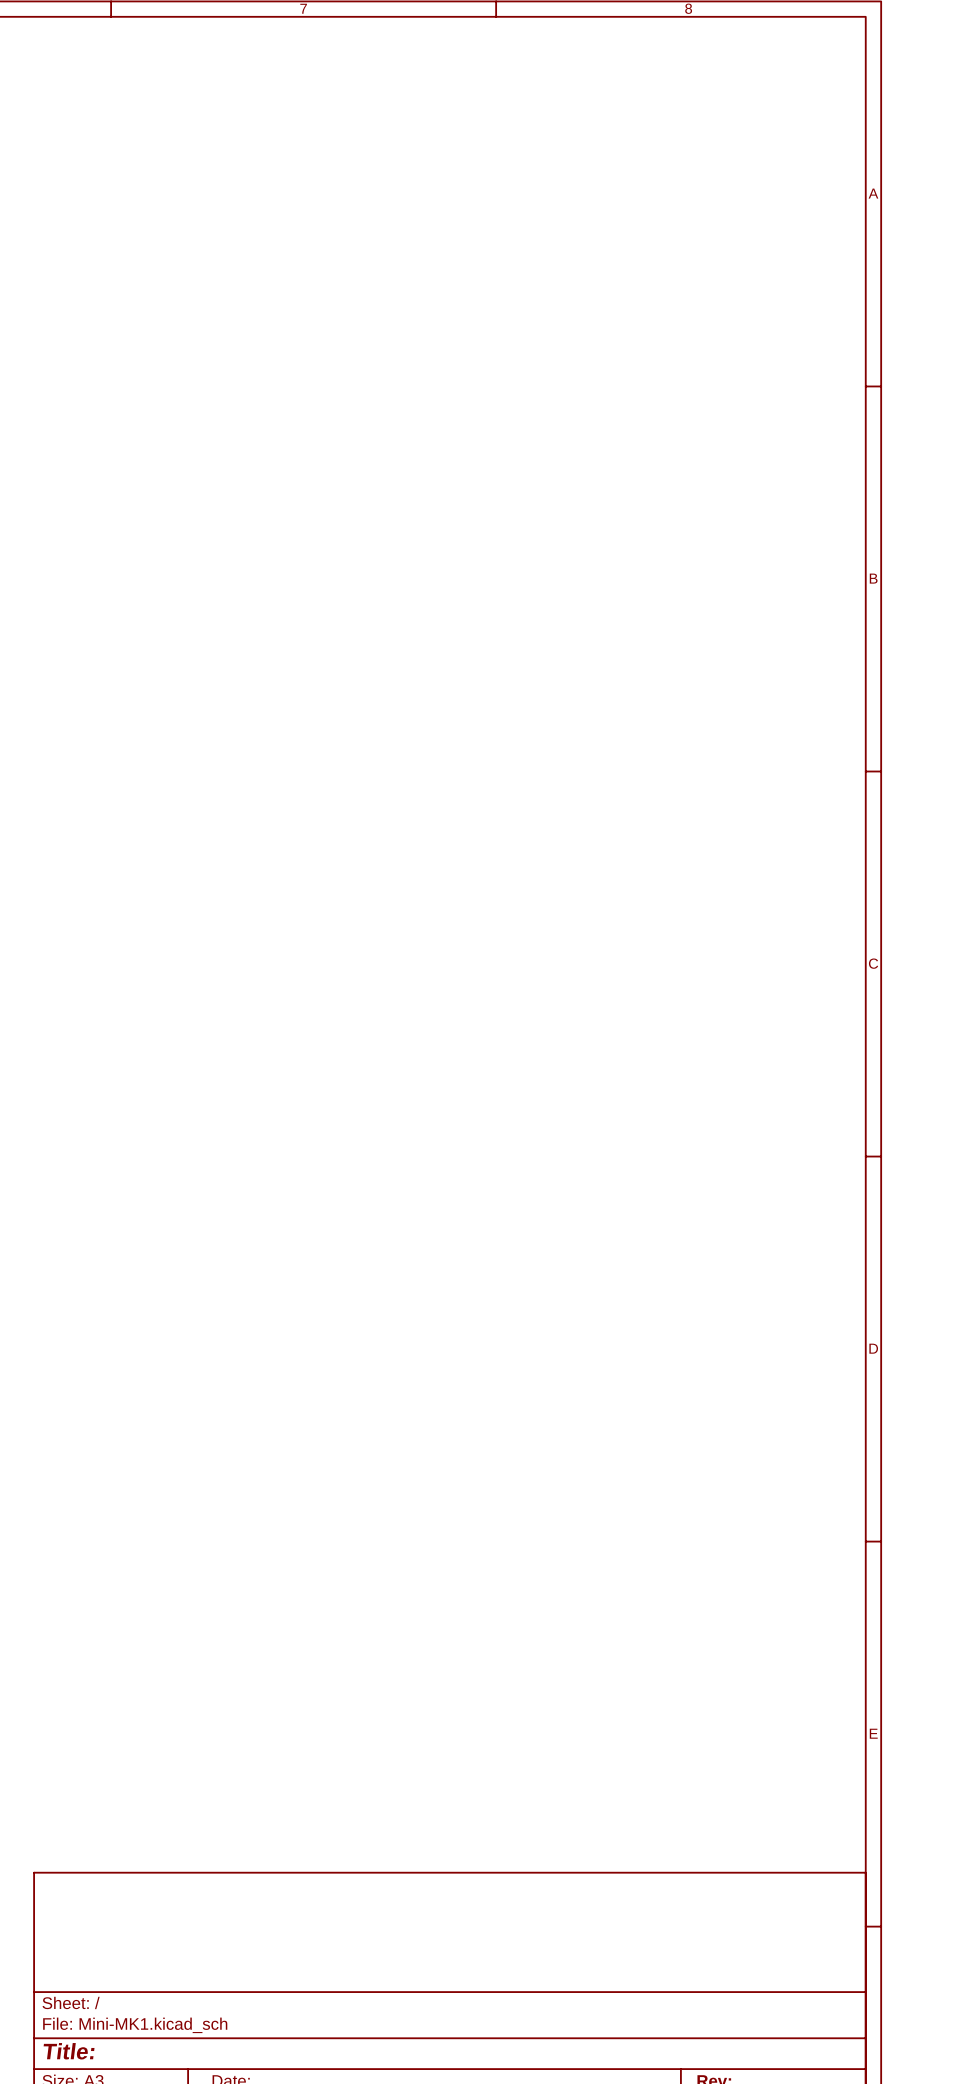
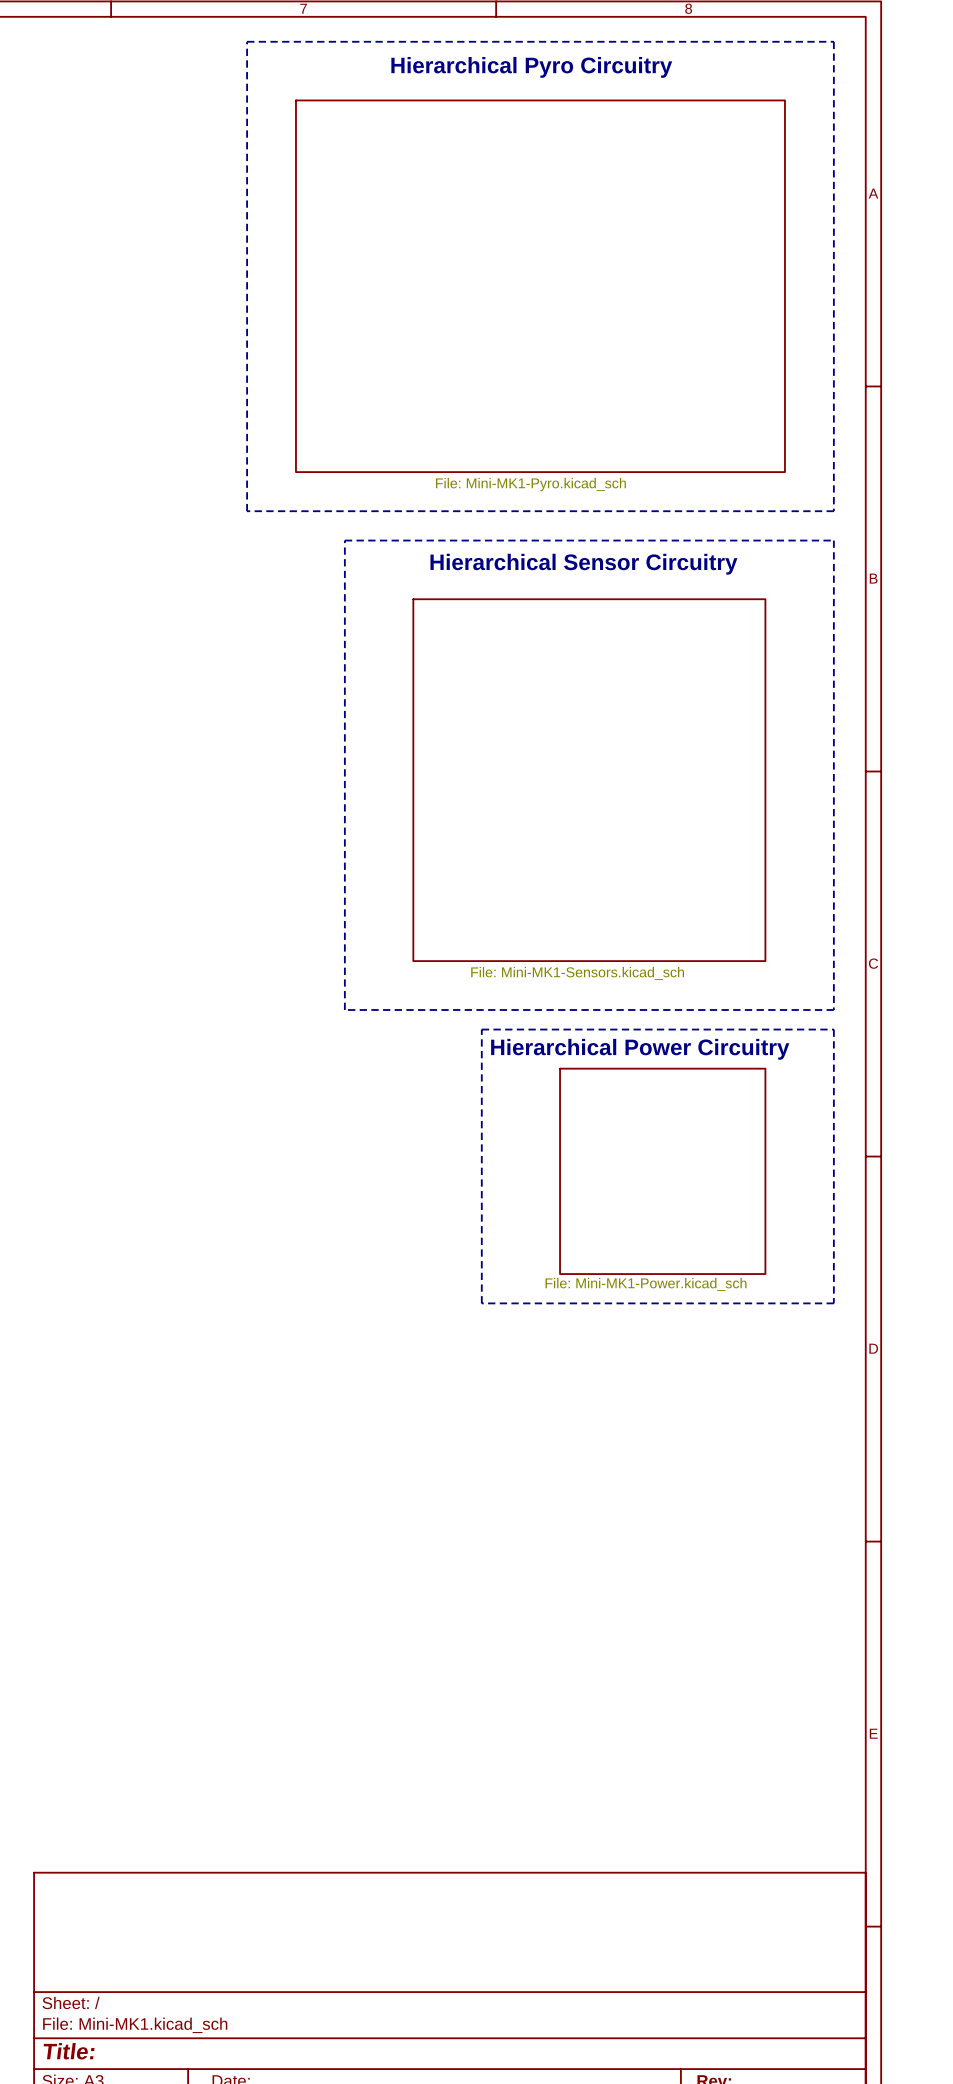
line: none -> (247, 41) (833, 41) (833, 511) (247, 511) (247, 41)
text: none -> Hierarchical Pyro Circuitry (531, 67)
sheet: none -> File: Mini-MK1-Pyro.kicad_sch (540, 286)
line: none -> (344, 540) (833, 540) (833, 1009) (344, 1009) (344, 540)
text: none -> Hierarchical Sensor Circuitry (583, 564)
sheet: none -> File: Mini-MK1-Sensors.kicad_sch (589, 780)
line: none -> (481, 1029) (833, 1029) (833, 1303) (481, 1303) (481, 1029)
text: none -> Hierarchical Power Circuitry (640, 1049)
sheet: none -> File: Mini-MK1-Power.kicad_sch (662, 1171)

